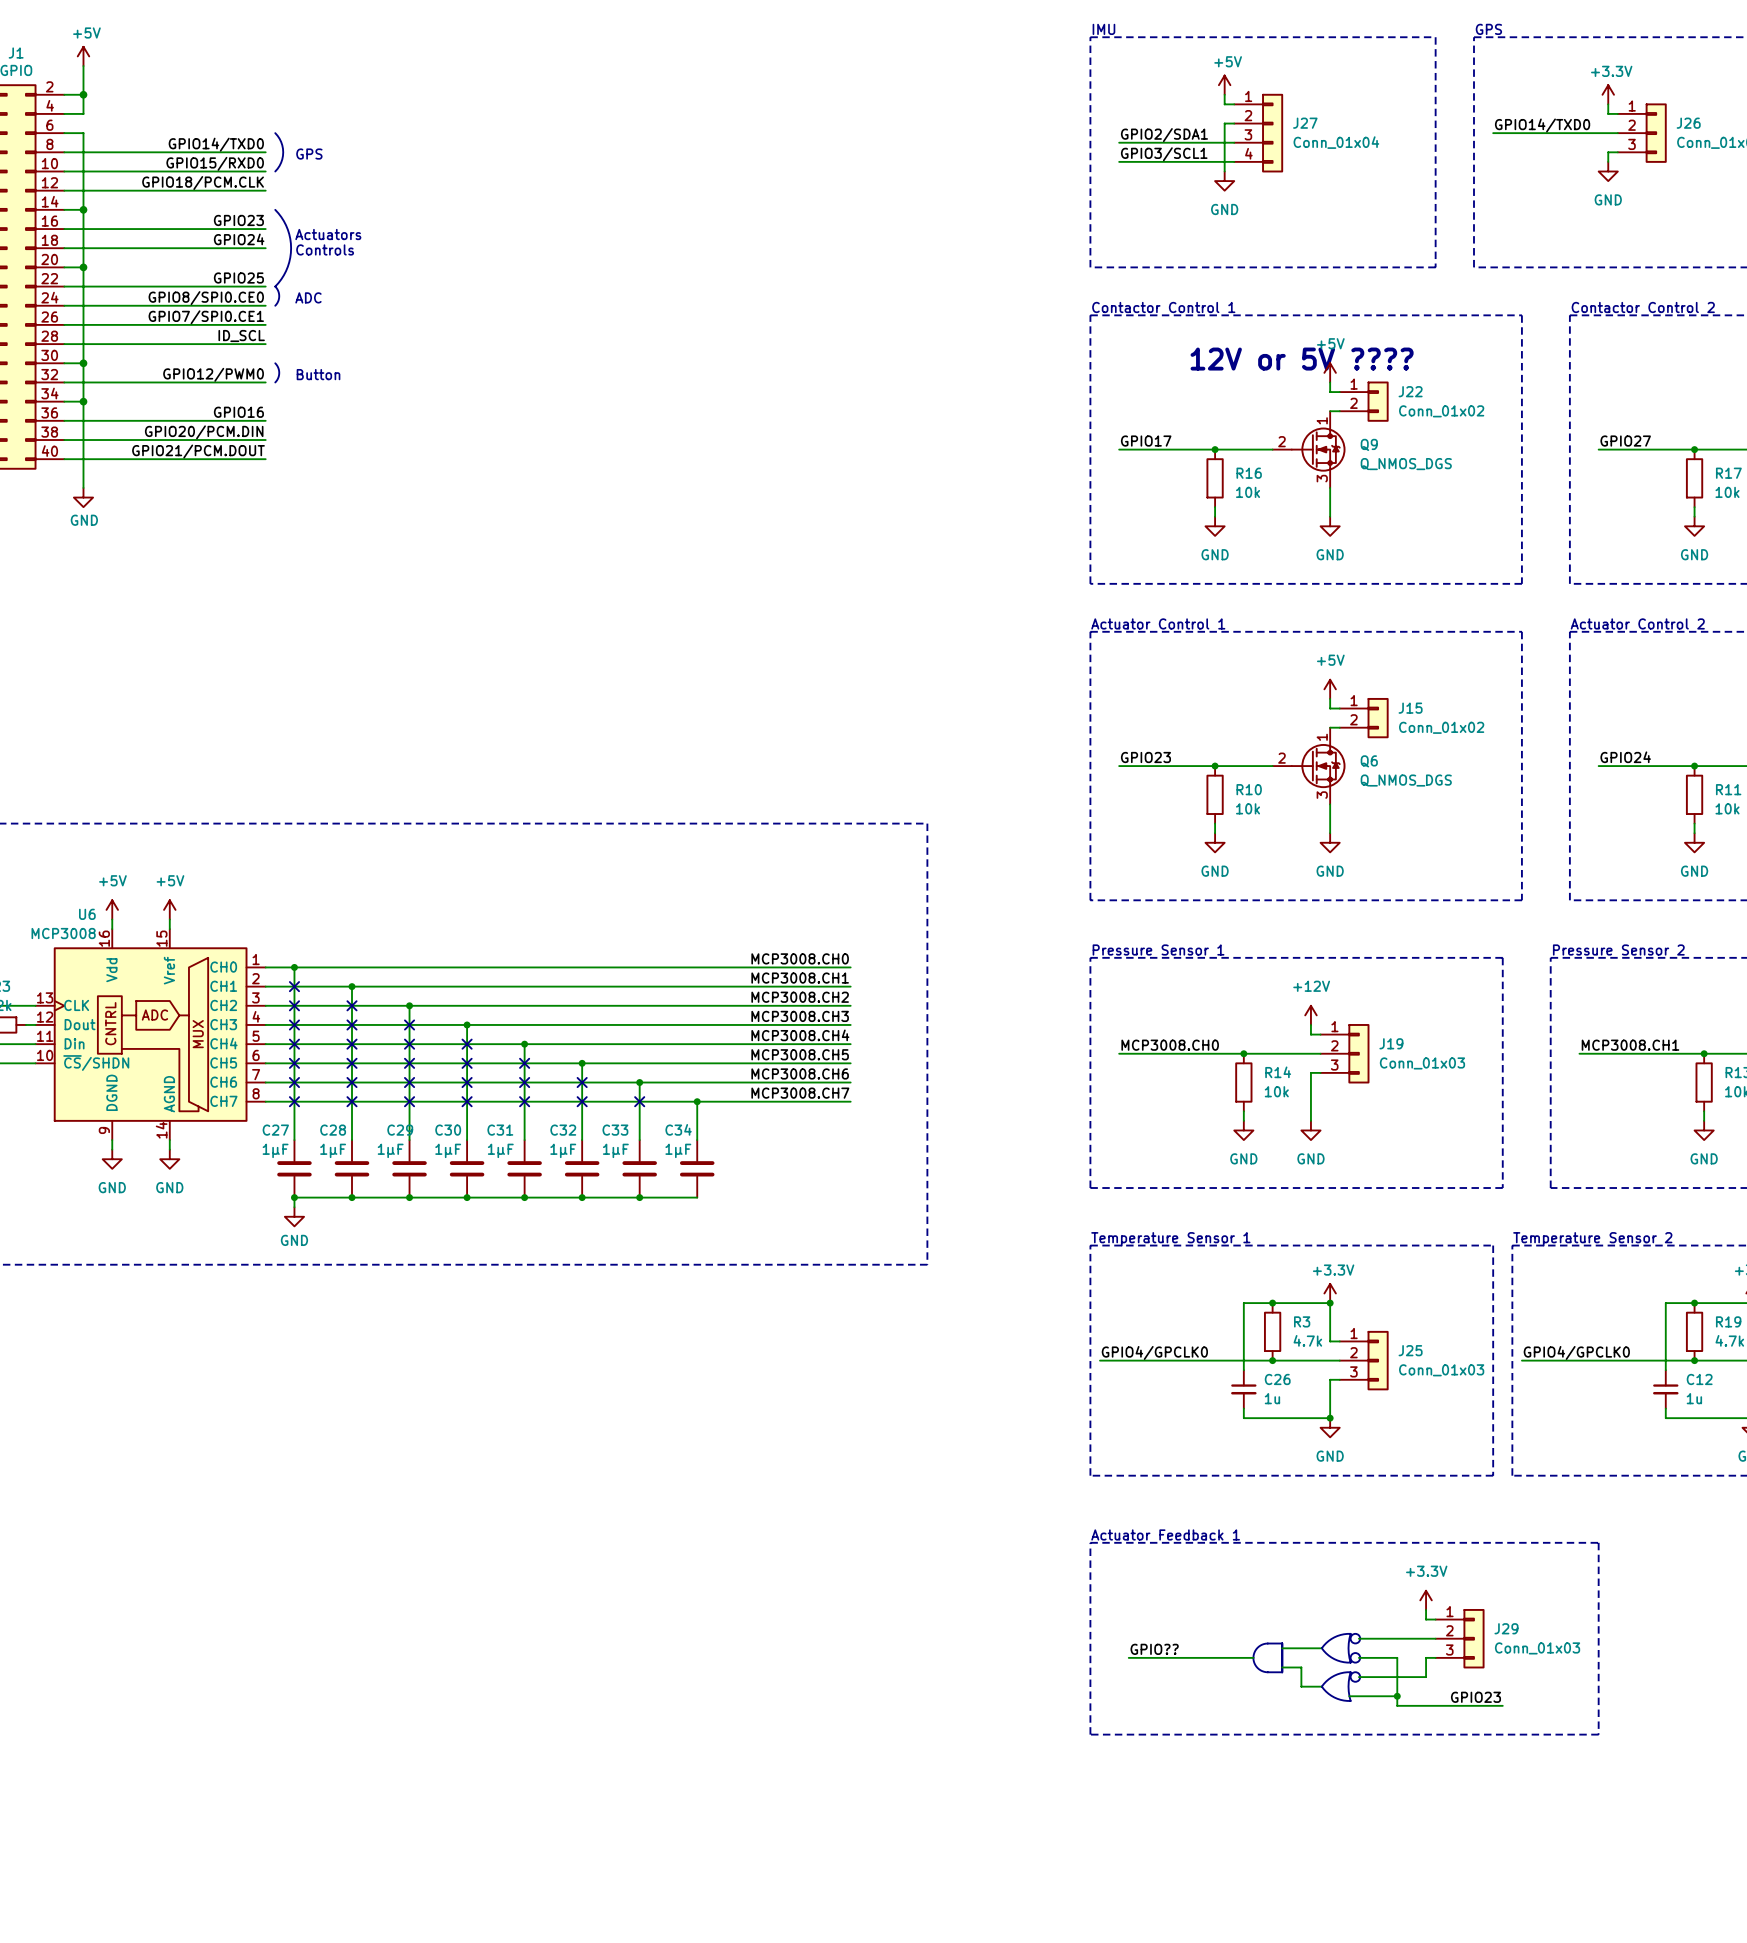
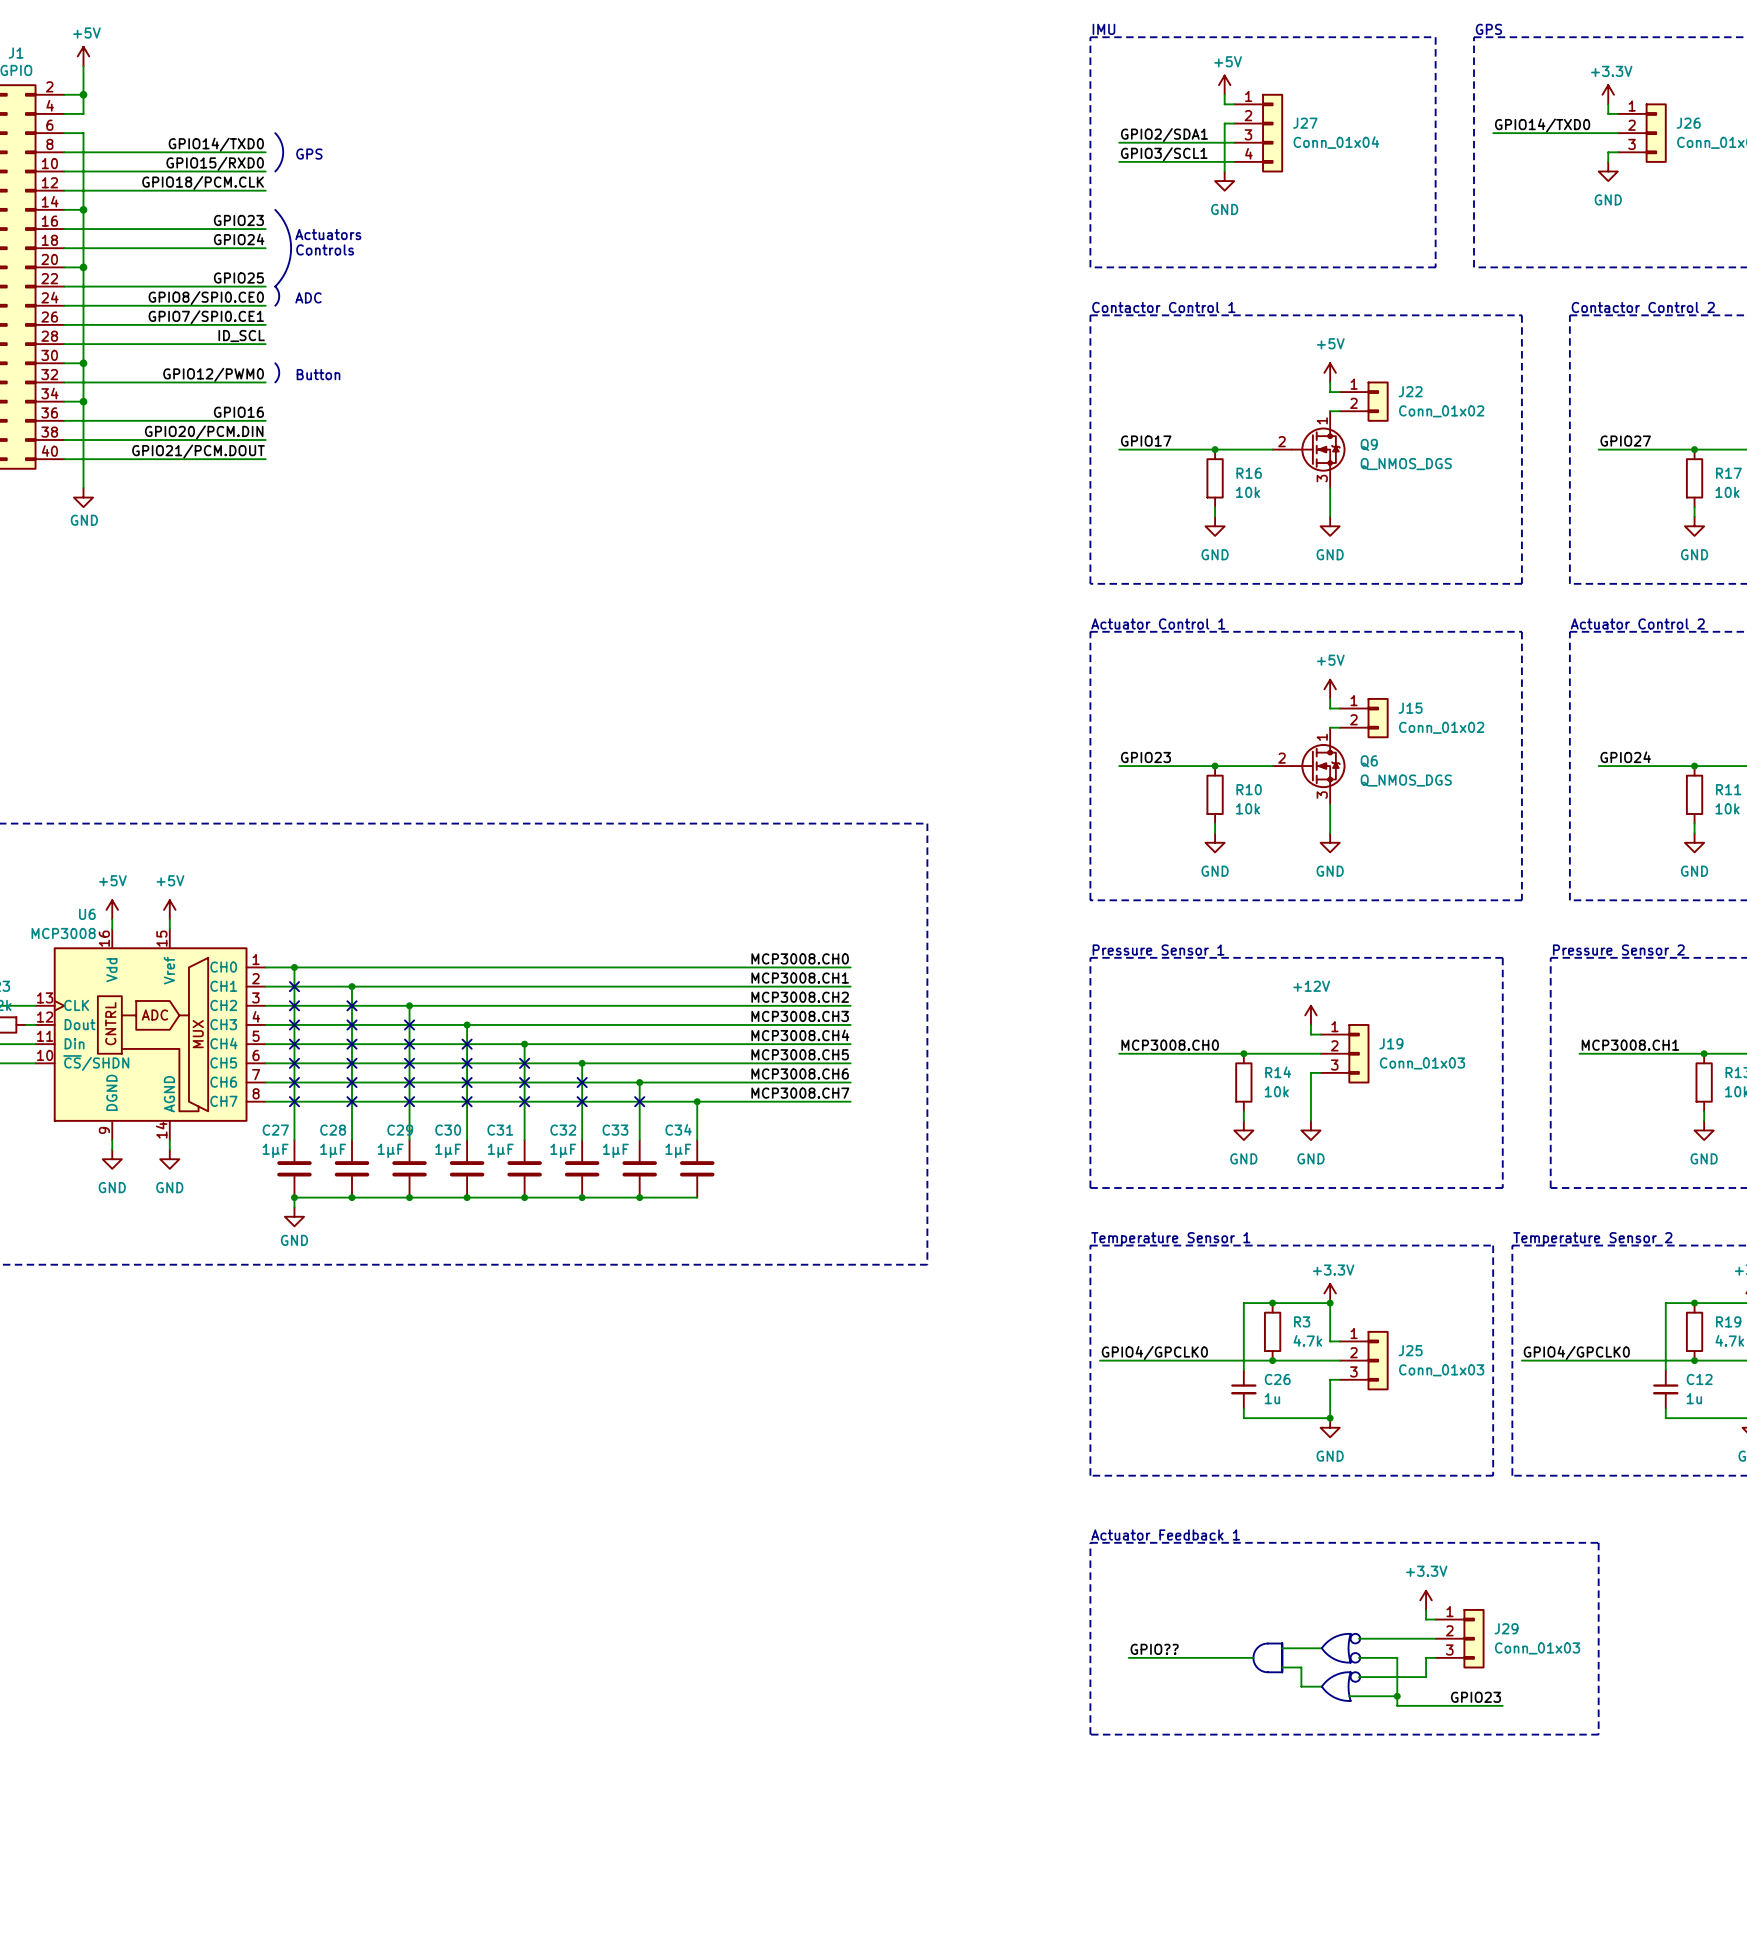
text: 12V or 5V ???? (1302, 359) -> none

